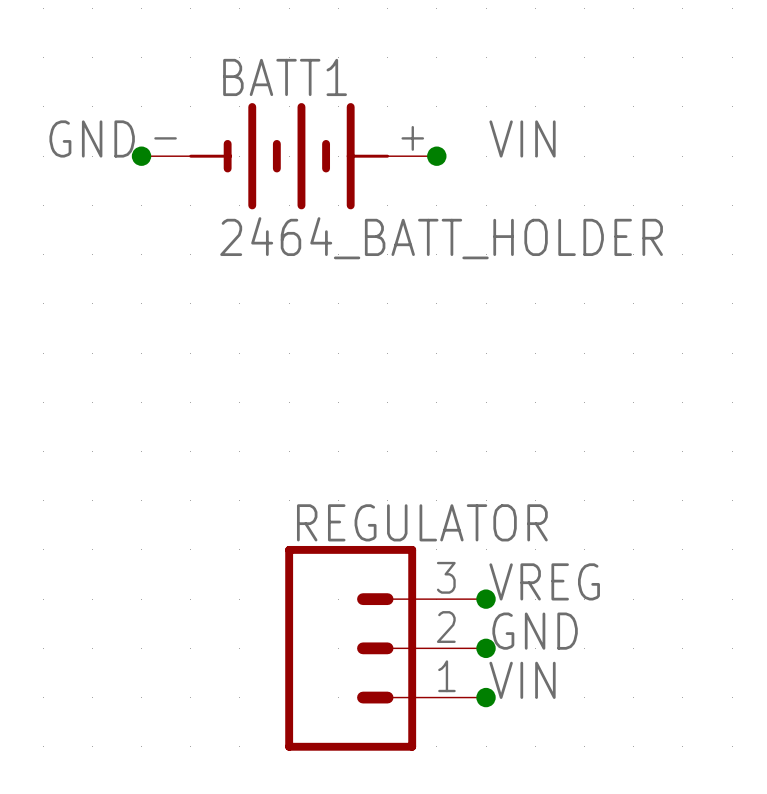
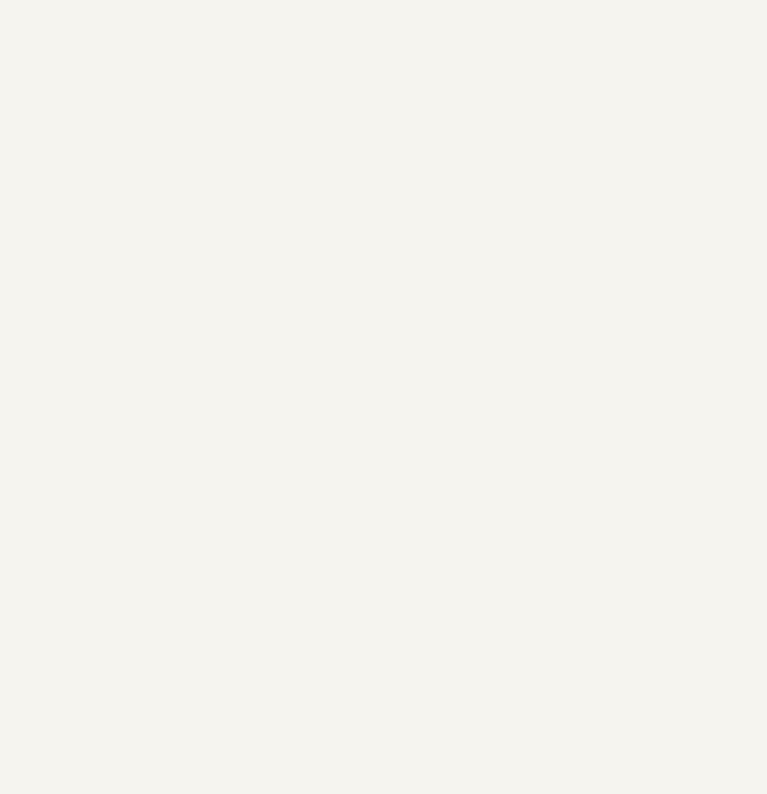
label: GND (92, 138) -> none
label: VIN (522, 138) -> none
junction: (141, 156) -> none
BATT1: 2464_BATT_HOLDER (289, 156) -> none
junction: (436, 156) -> none
label: VREG (544, 581) -> none
junction: (486, 599) -> none
label: GND (535, 631) -> none
REGULATOR: (385, 648) -> none
junction: (486, 648) -> none
label: VIN (522, 680) -> none
junction: (486, 697) -> none

